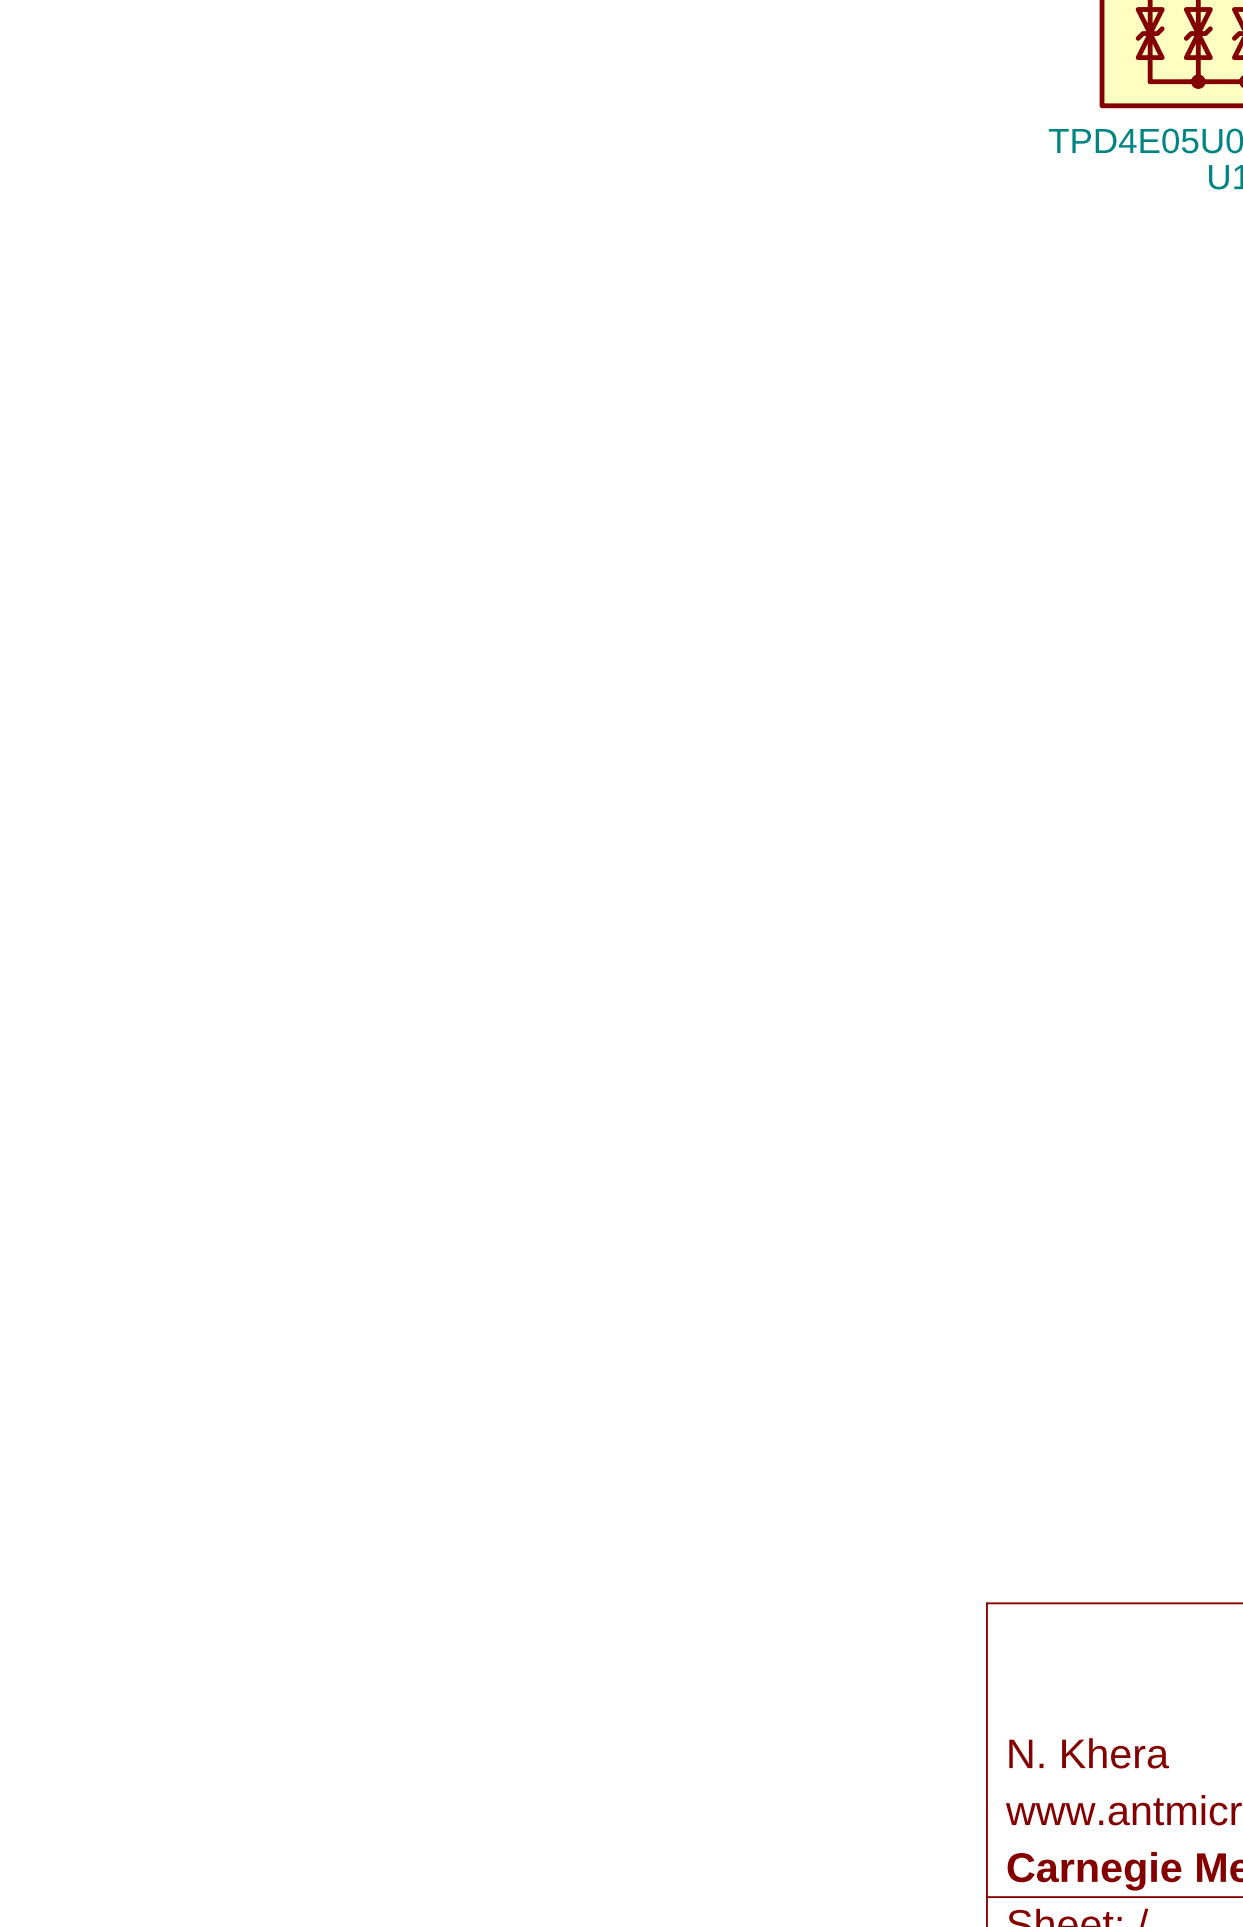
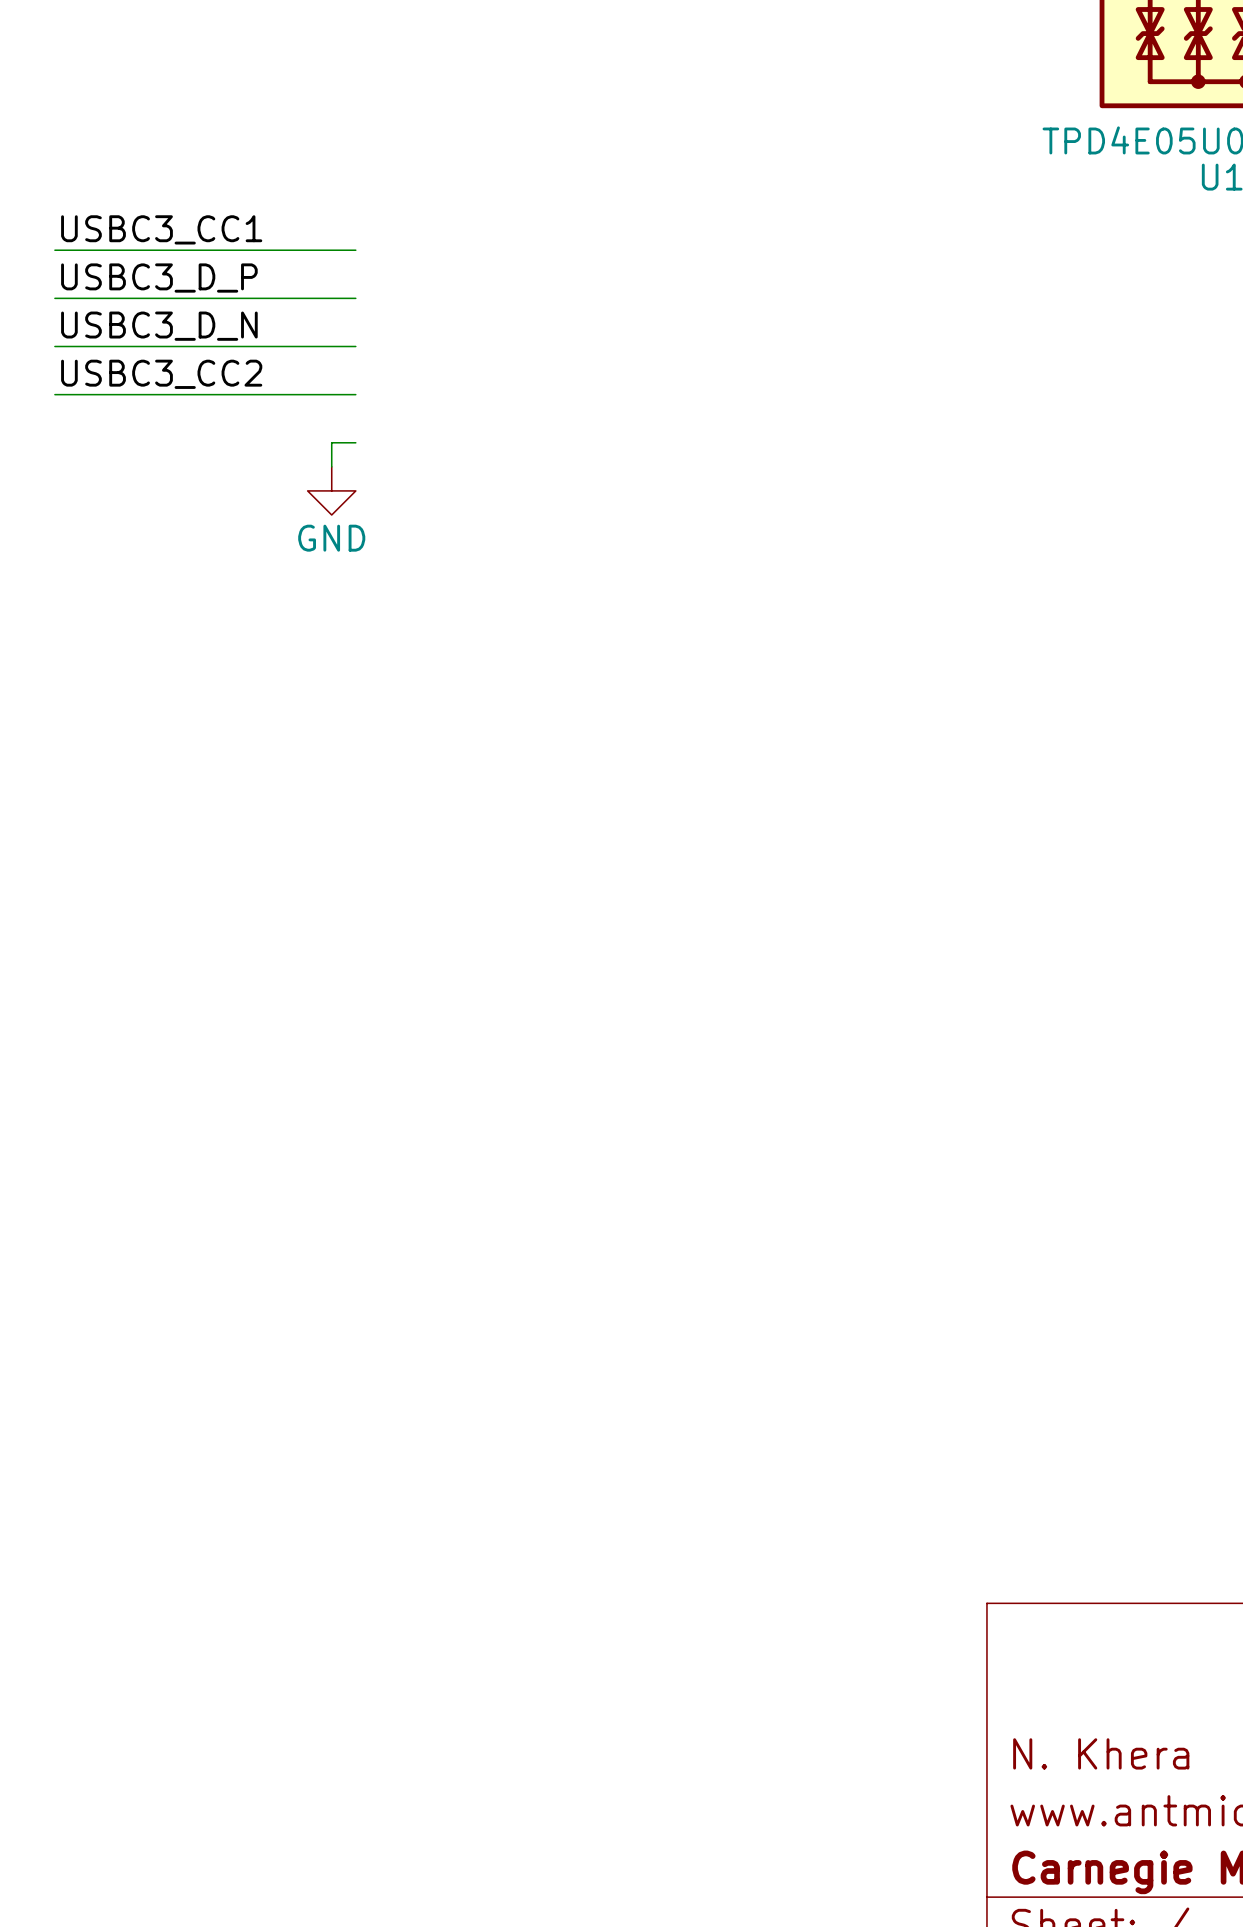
label: none -> USBC3_CC1 (161, 229)
wire: none -> (54, 250) (355, 250)
label: none -> USBC3_D_P (159, 278)
wire: none -> (54, 298) (355, 298)
label: none -> USBC3_D_N (159, 326)
wire: none -> (54, 346) (355, 346)
label: none -> USBC3_CC2 (161, 374)
wire: none -> (54, 394) (355, 394)
wire: none -> (355, 442) (331, 442) (331, 466)
power symbol: none -> GND (331, 490)

